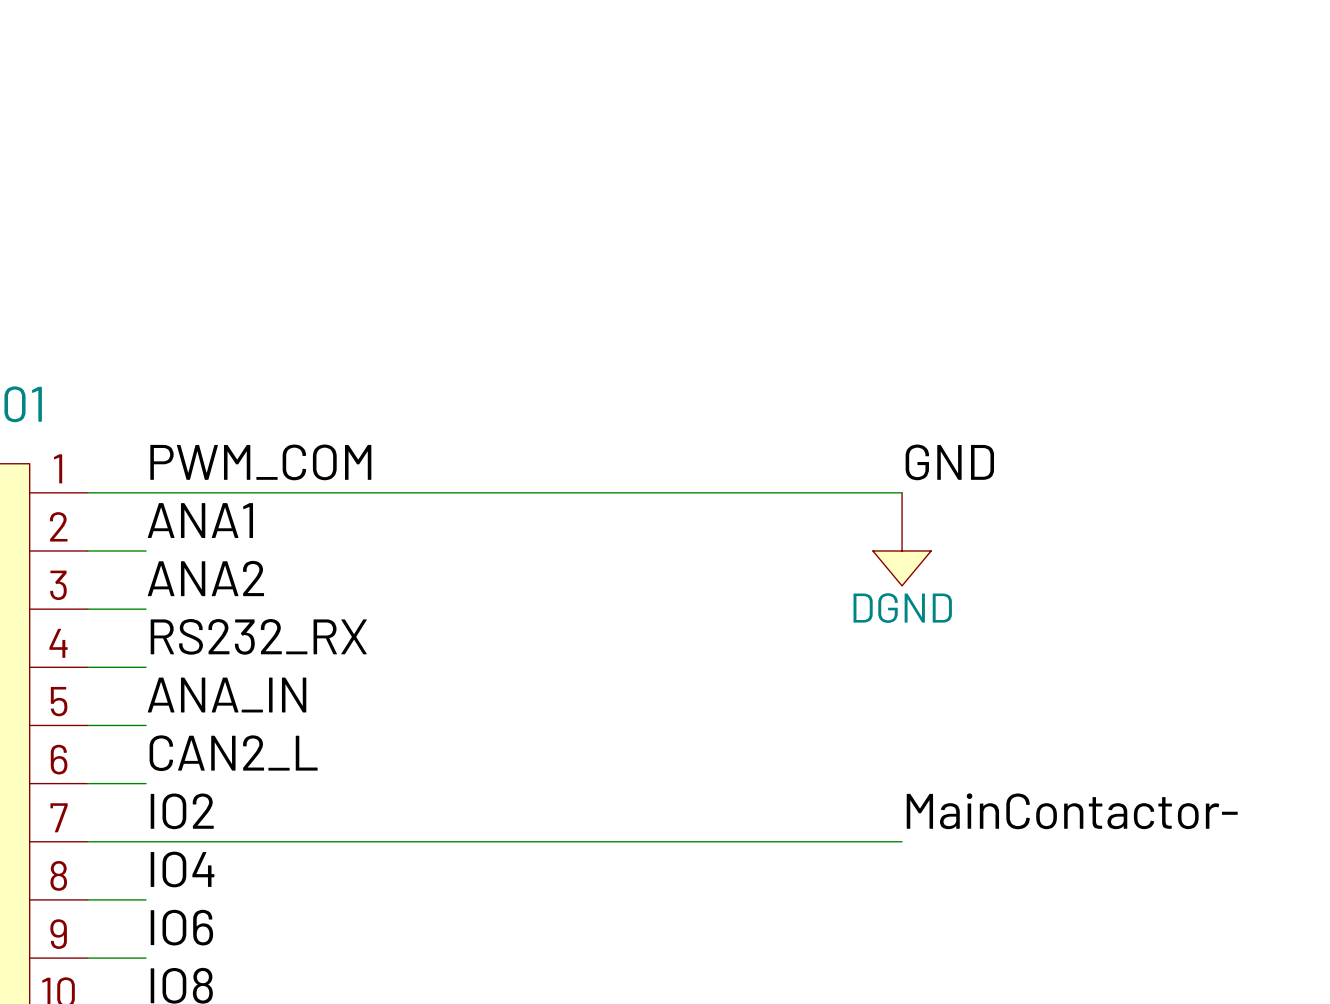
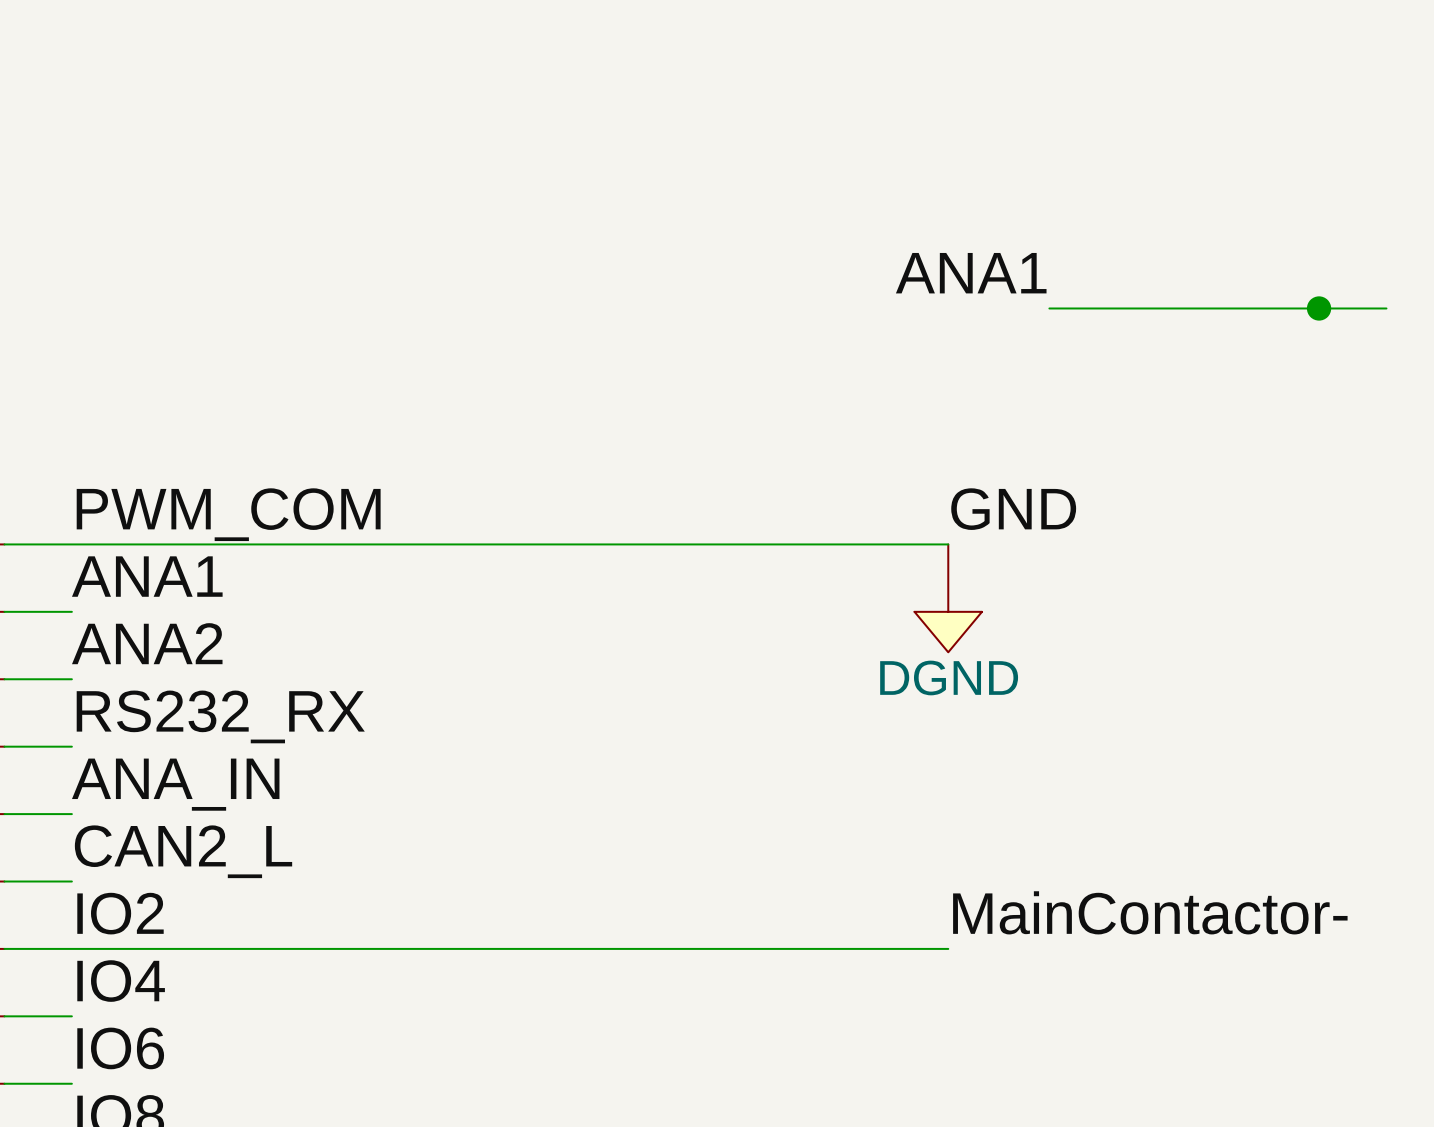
label: none -> ANA1 (971, 273)
wire: none -> (1049, 308) (1386, 308)
junction: none -> (1319, 308)

